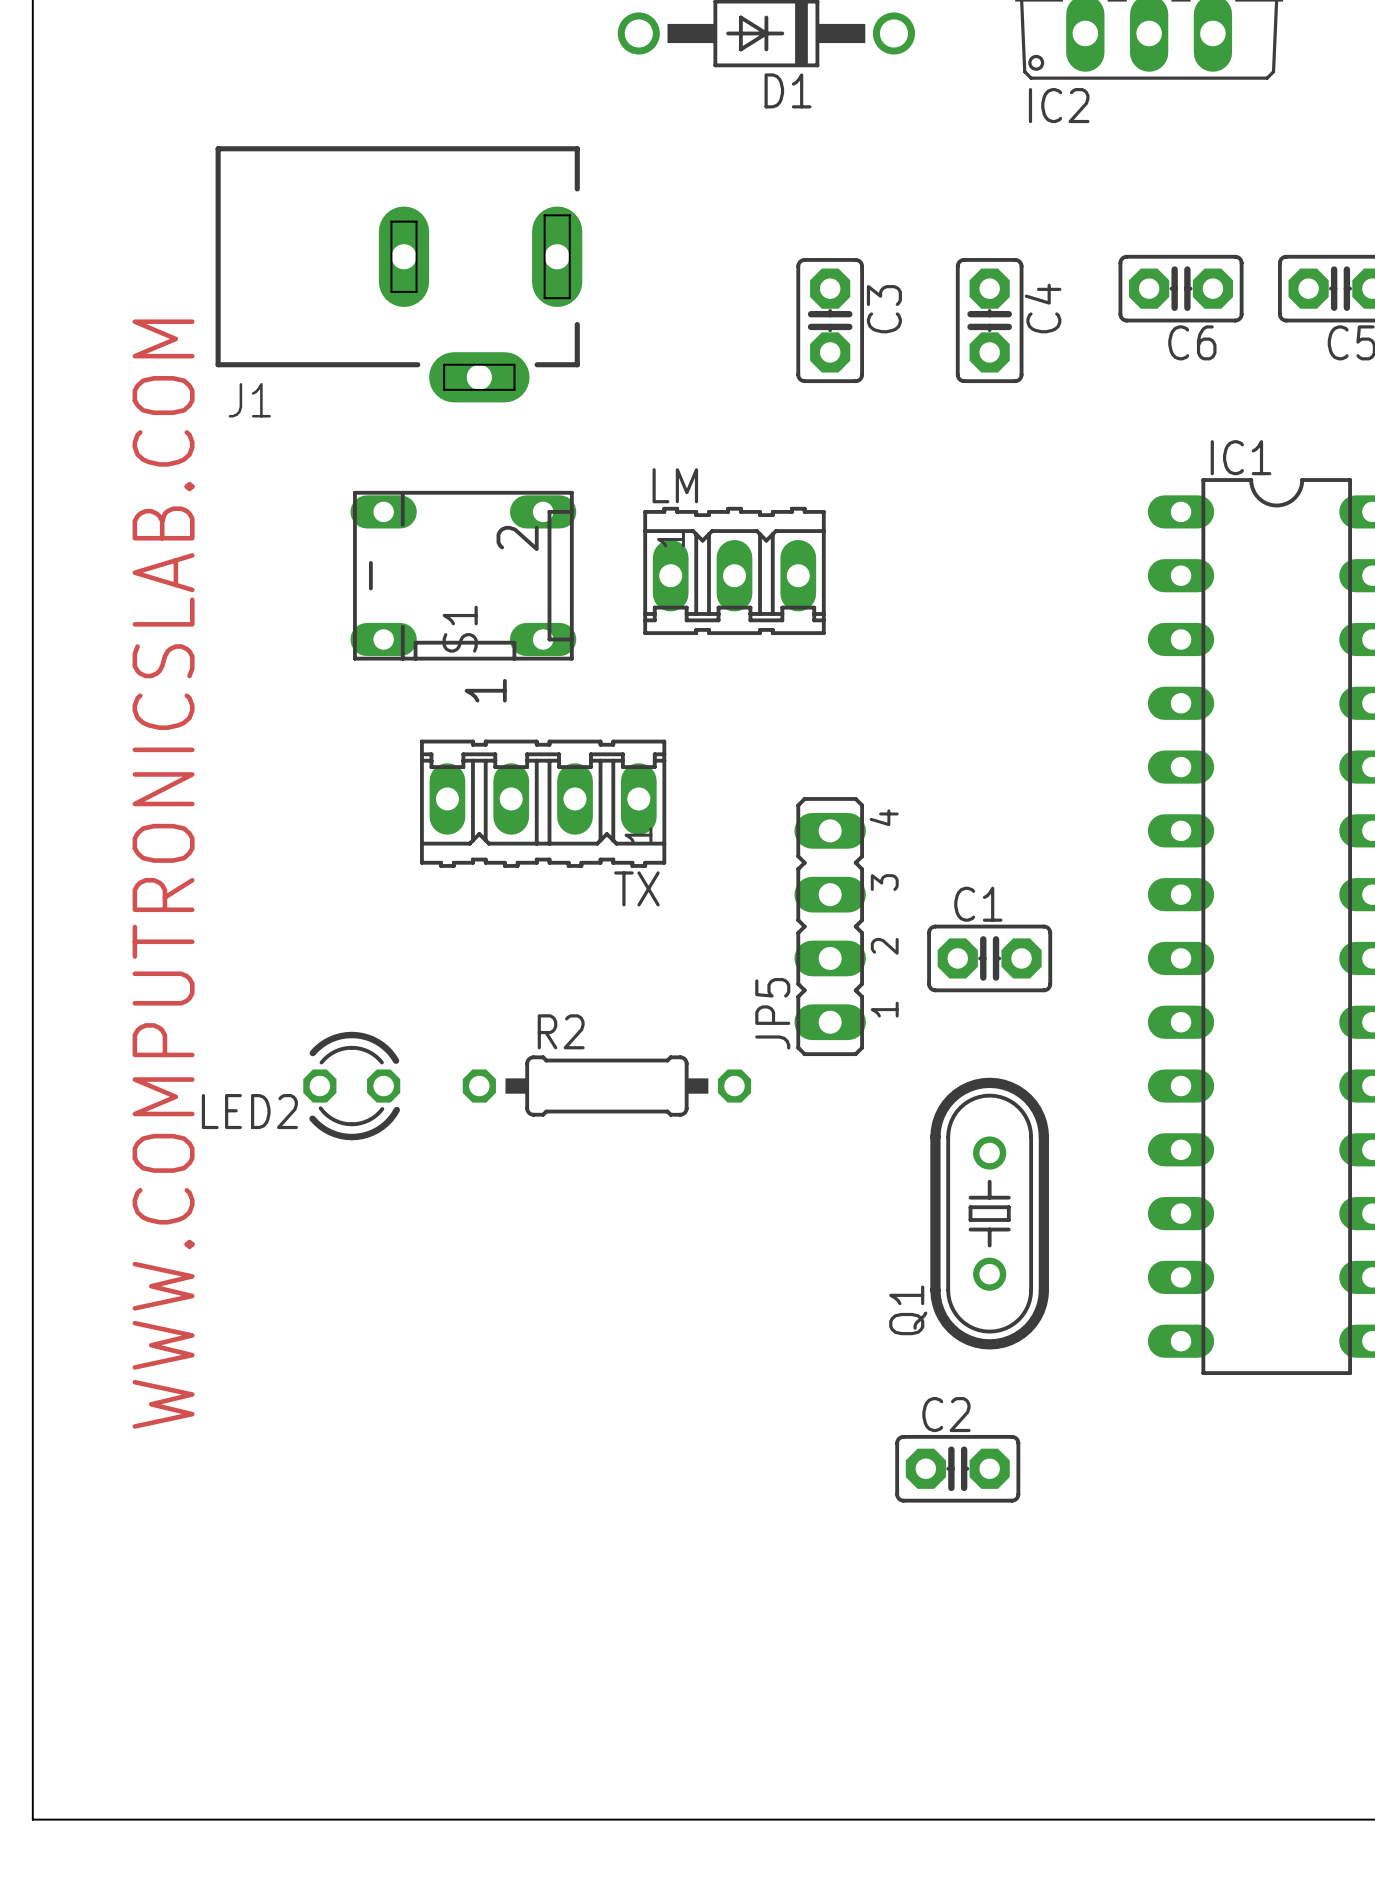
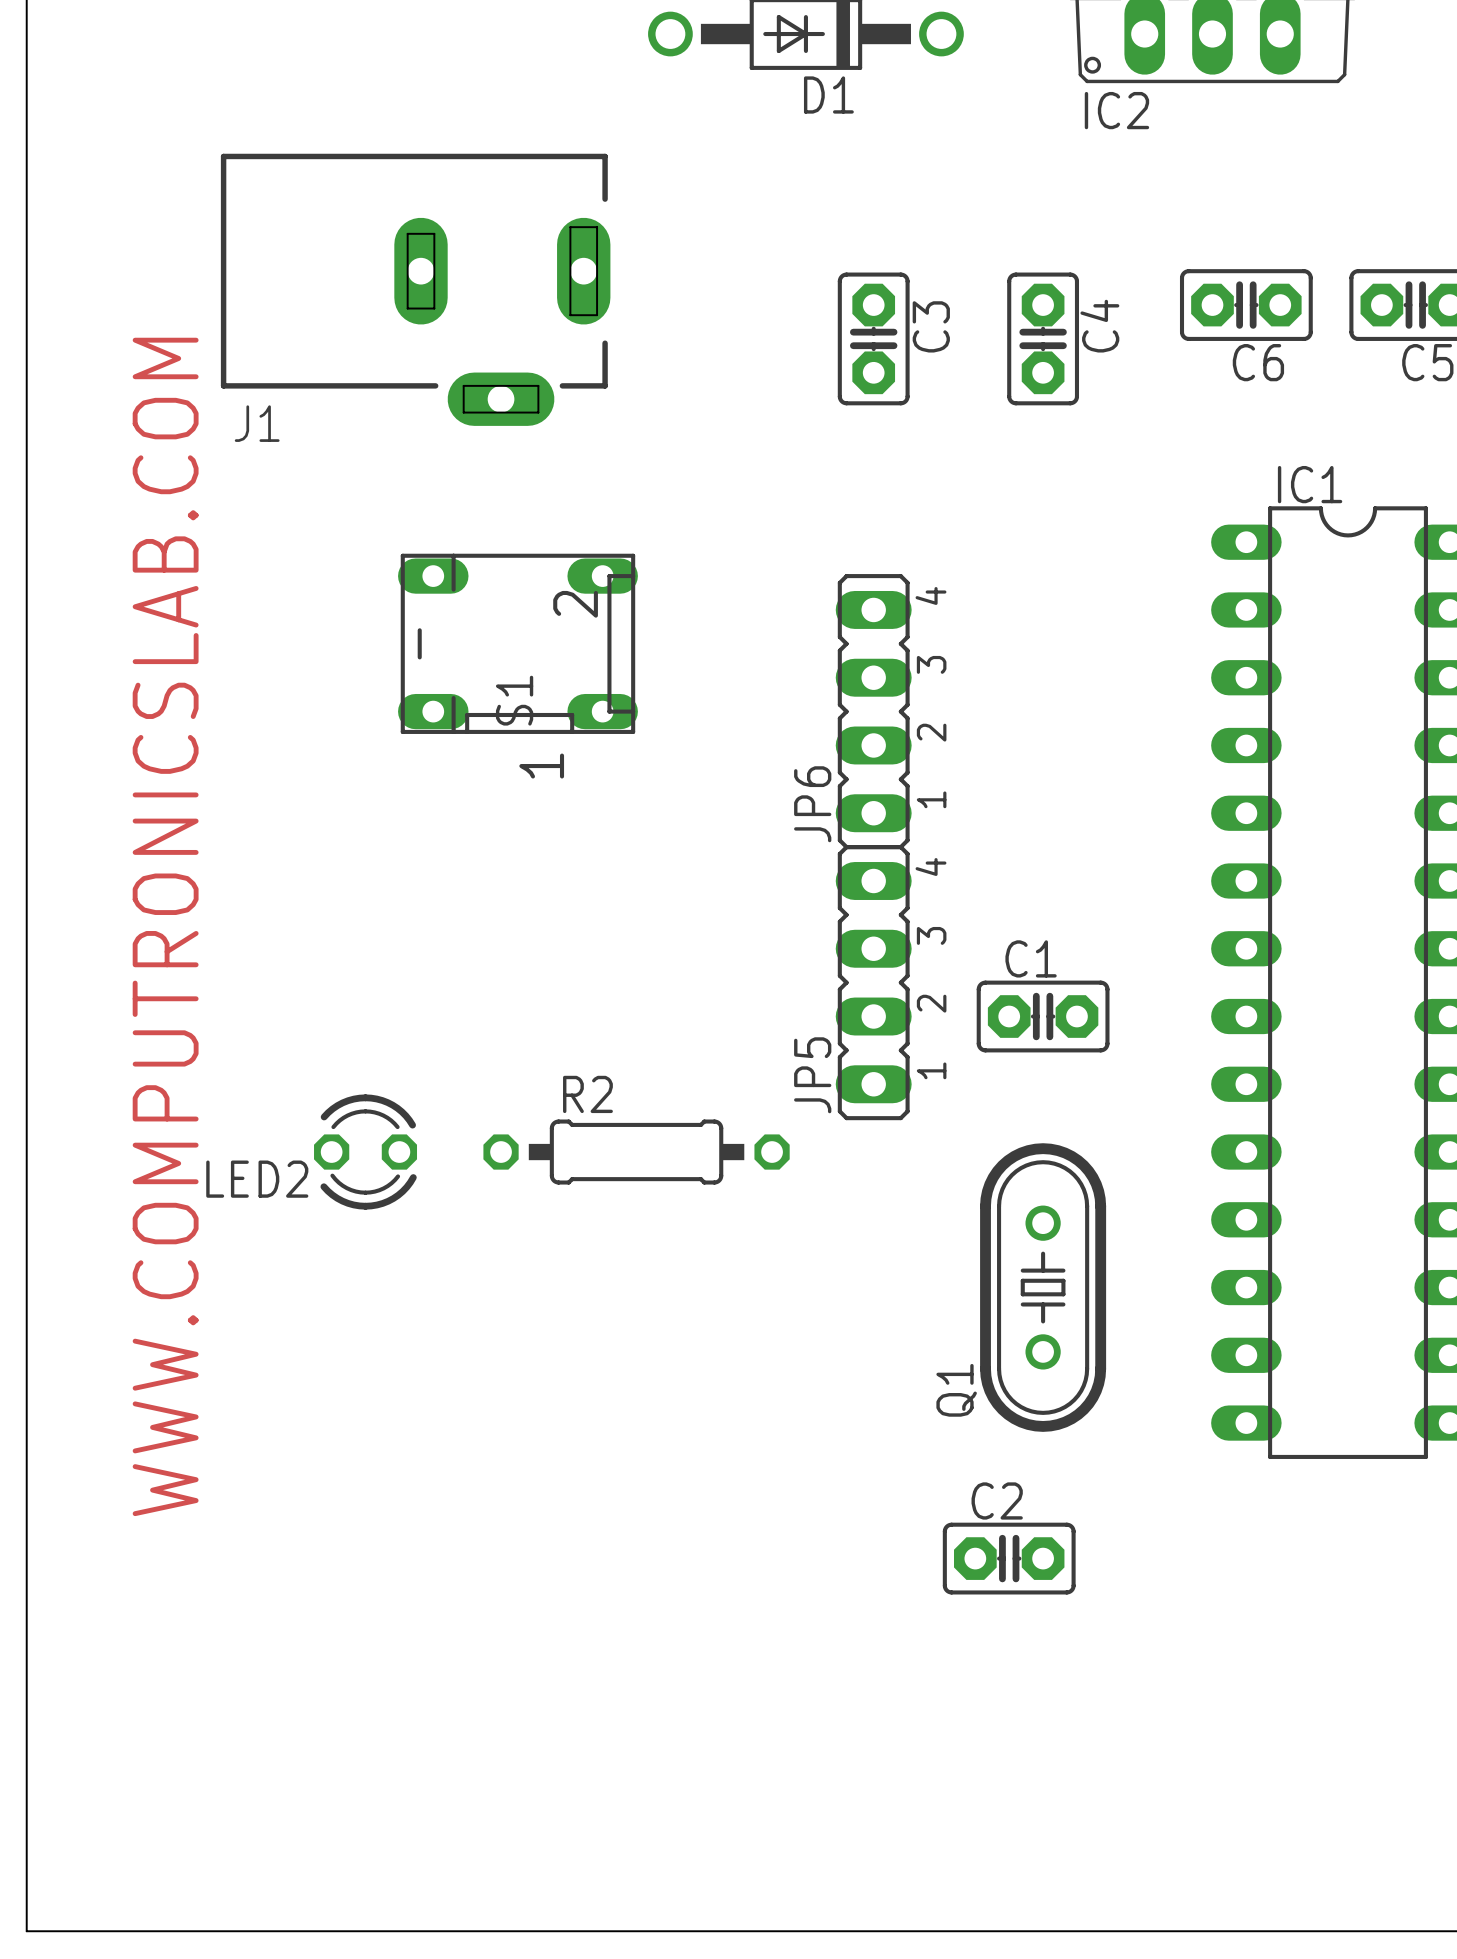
LM: (734, 570) -> none
S1 position: (463, 575) -> (517, 643)
JP6: none -> (873, 711)
TX: (543, 803) -> none

